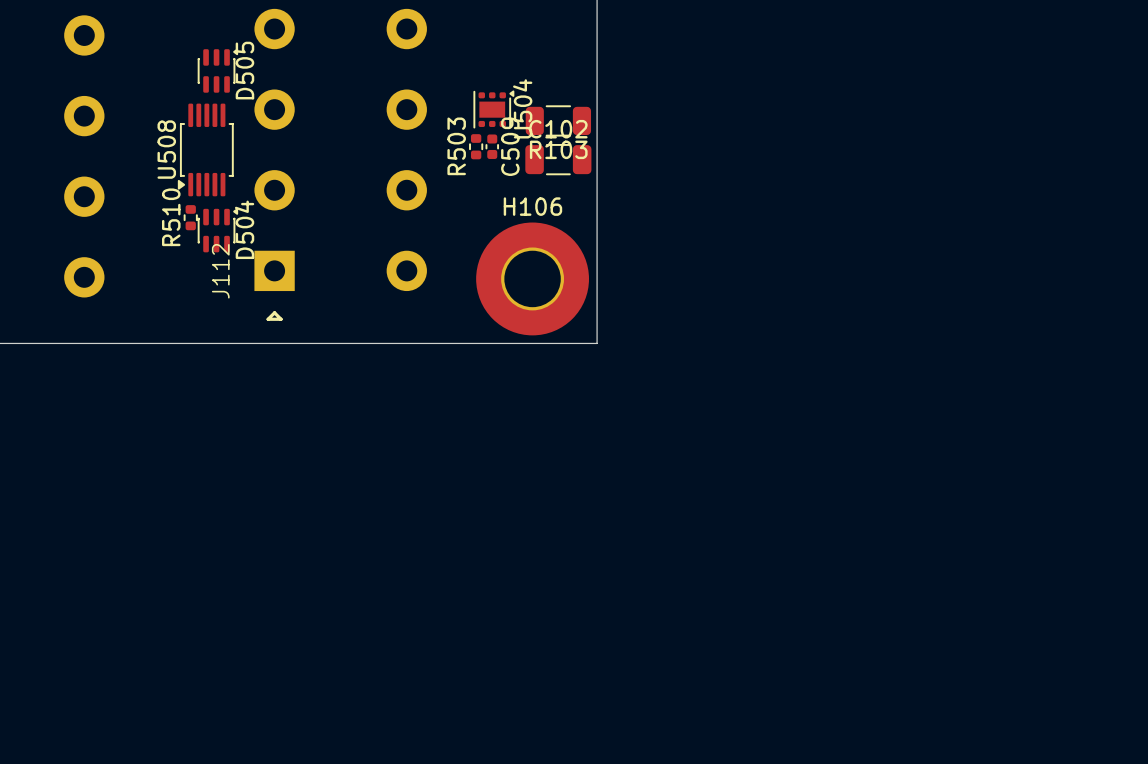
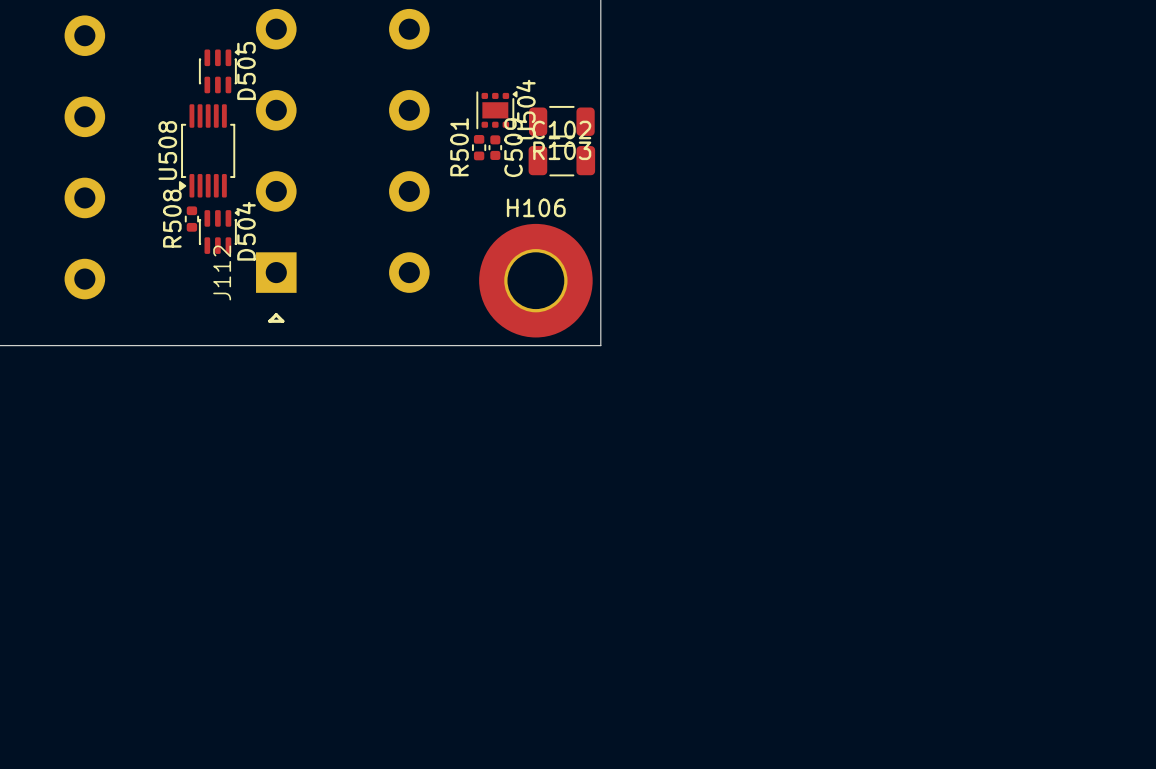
R503 name: R503 (456, 146) -> R501 (459, 147)
R510 name: R510 (171, 217) -> R508 (172, 218)

